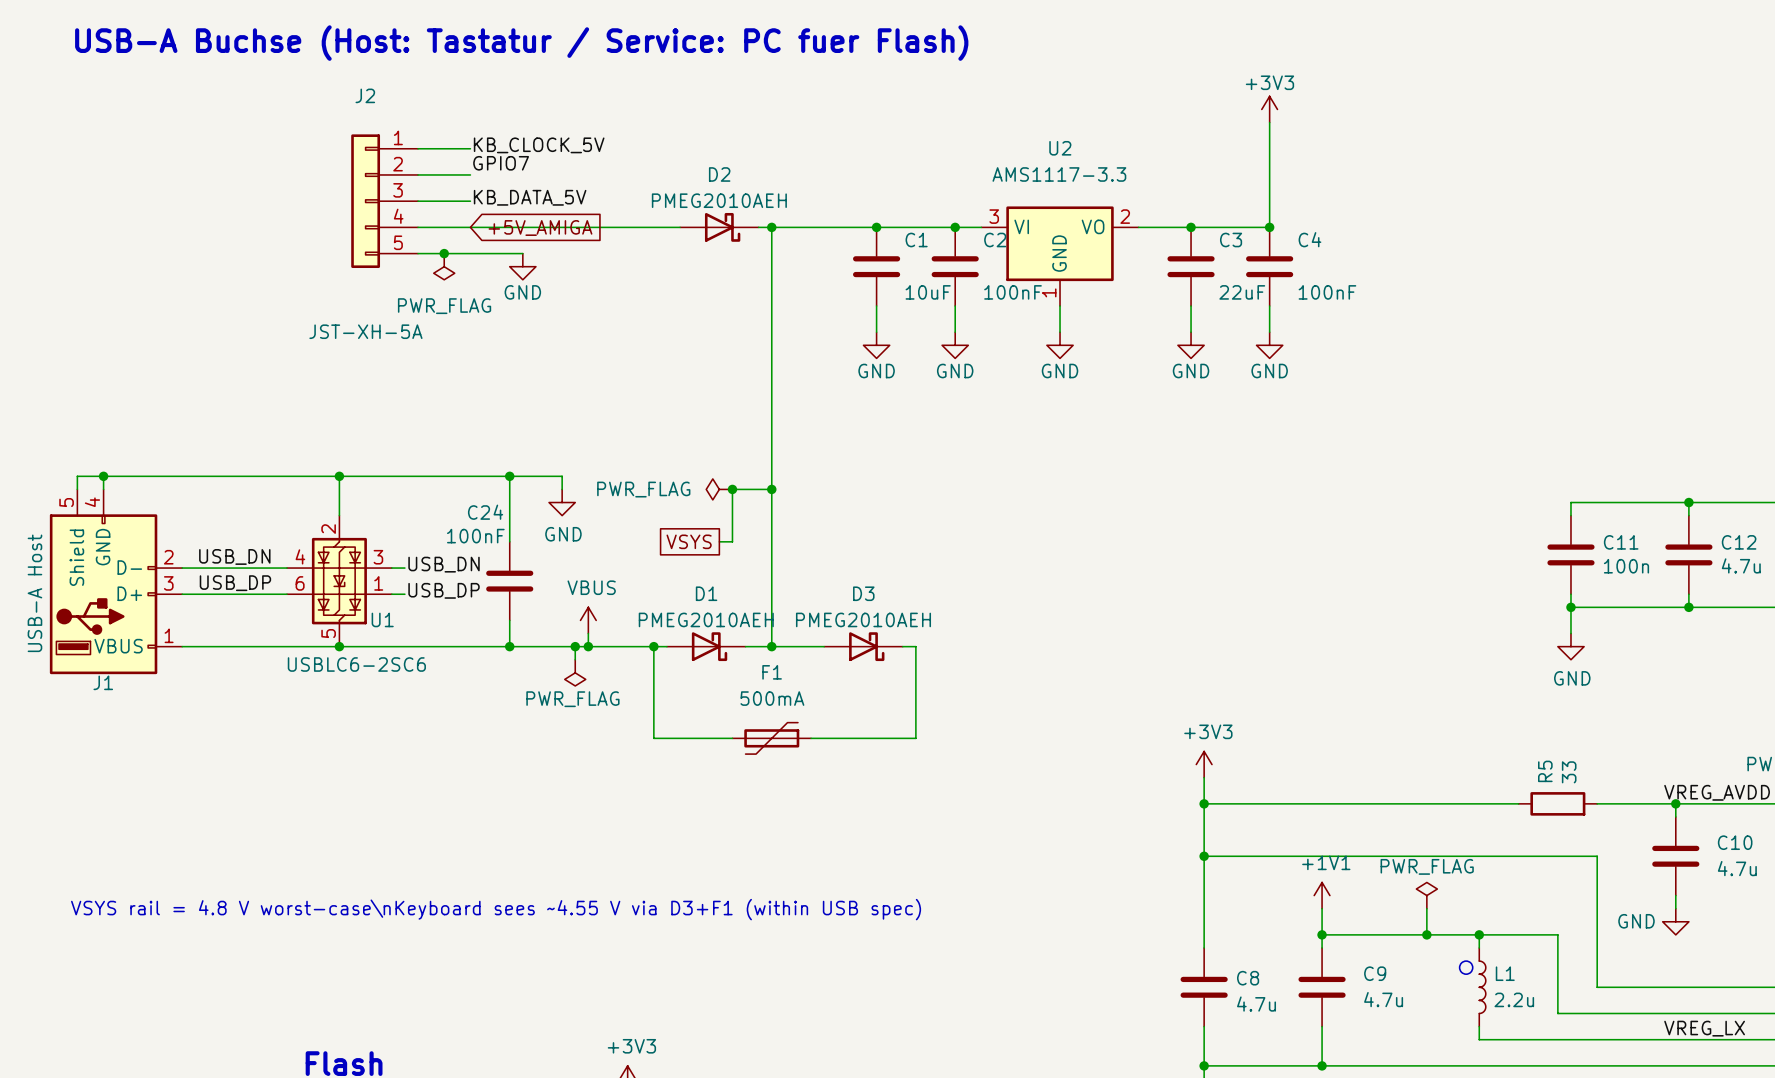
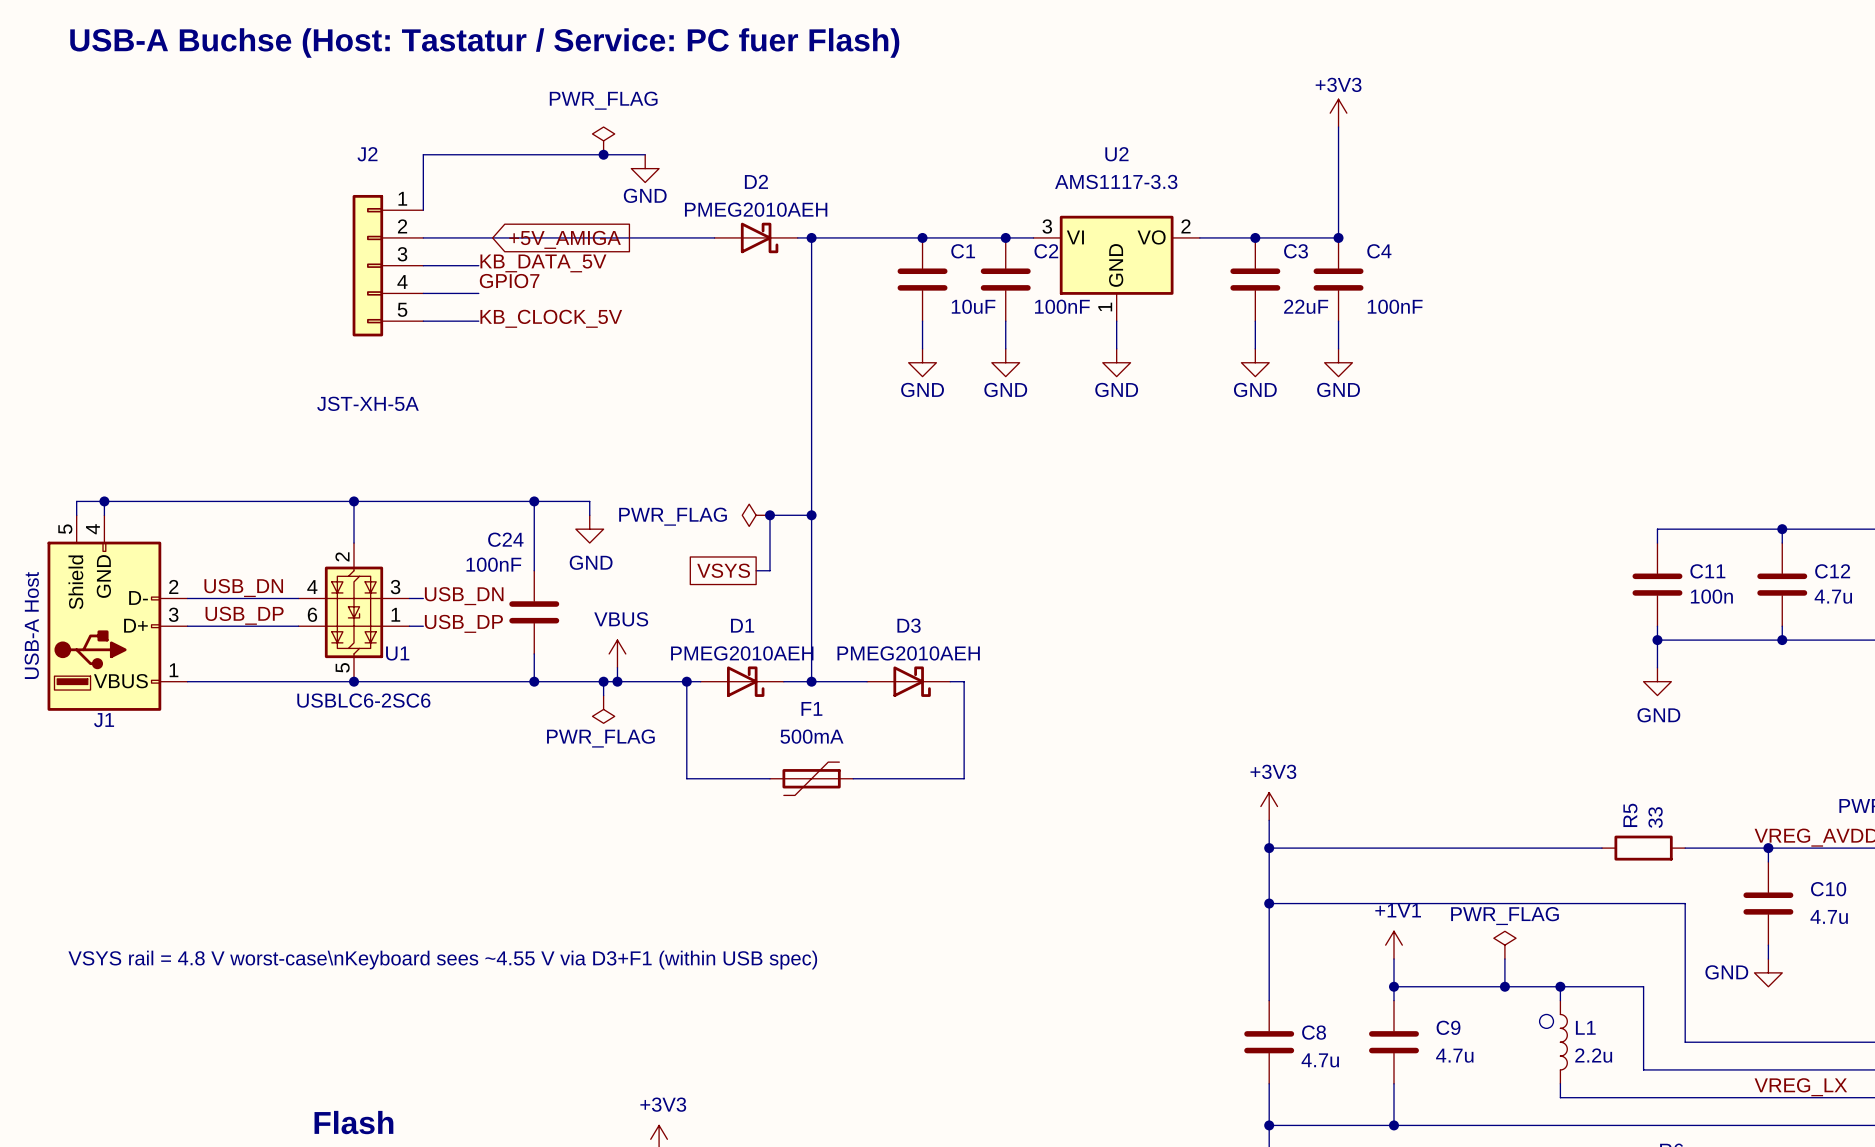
label position: KB_CLOCK_5V (539, 145) -> KB_CLOCK_5V (551, 318)
wire: none -> (437, 154) (423, 154) (423, 210)
wire: none -> (492, 154) (645, 154)
junction: none -> (603, 154)
label position: GPIO7 (501, 163) -> GPIO7 (509, 281)
wire: (418, 174) (470, 174) -> (423, 293) (478, 293)
label position: KB_DATA_5V (530, 197) -> KB_DATA_5V (543, 263)
J2 position: (384, 201) -> (387, 265)
wire: (418, 201) (470, 201) -> (423, 321) (478, 321)
junction: (444, 253) -> none
wire: (457, 253) (522, 253) -> none
power symbol rotation: 0° (444, 266) -> 180° (603, 140)
power symbol position: PWR_FLAG (444, 266) -> PWR_FLAG (603, 140)
power symbol position: GND (522, 266) -> GND (645, 168)

